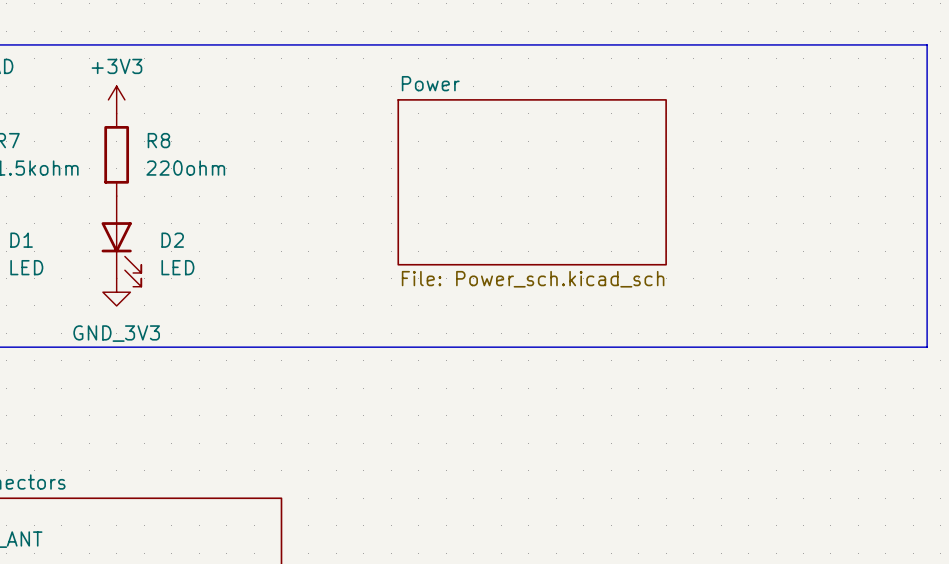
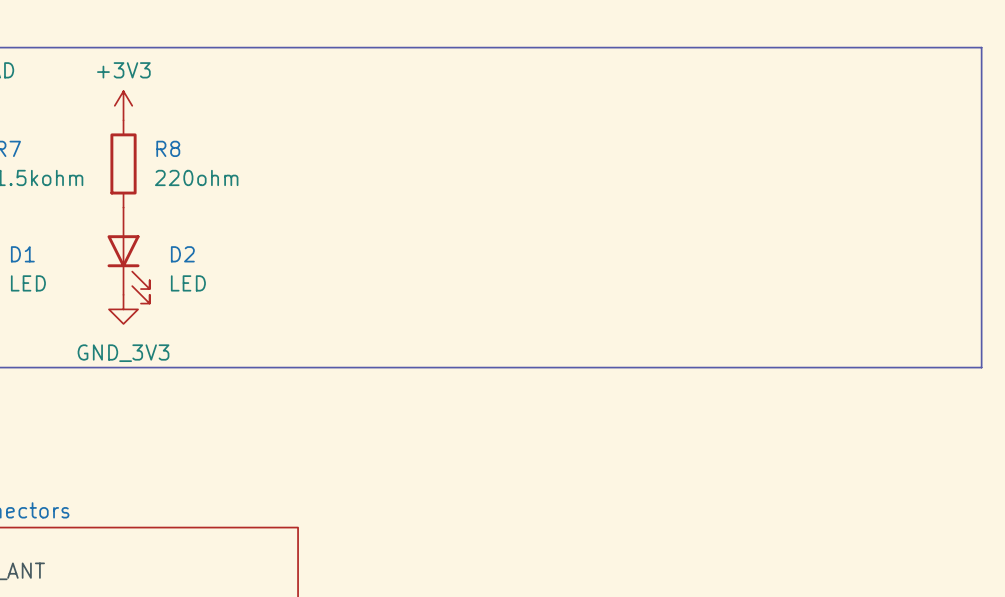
sheet Power: File: Power_sch.kicad_sch (532, 182) -> none

